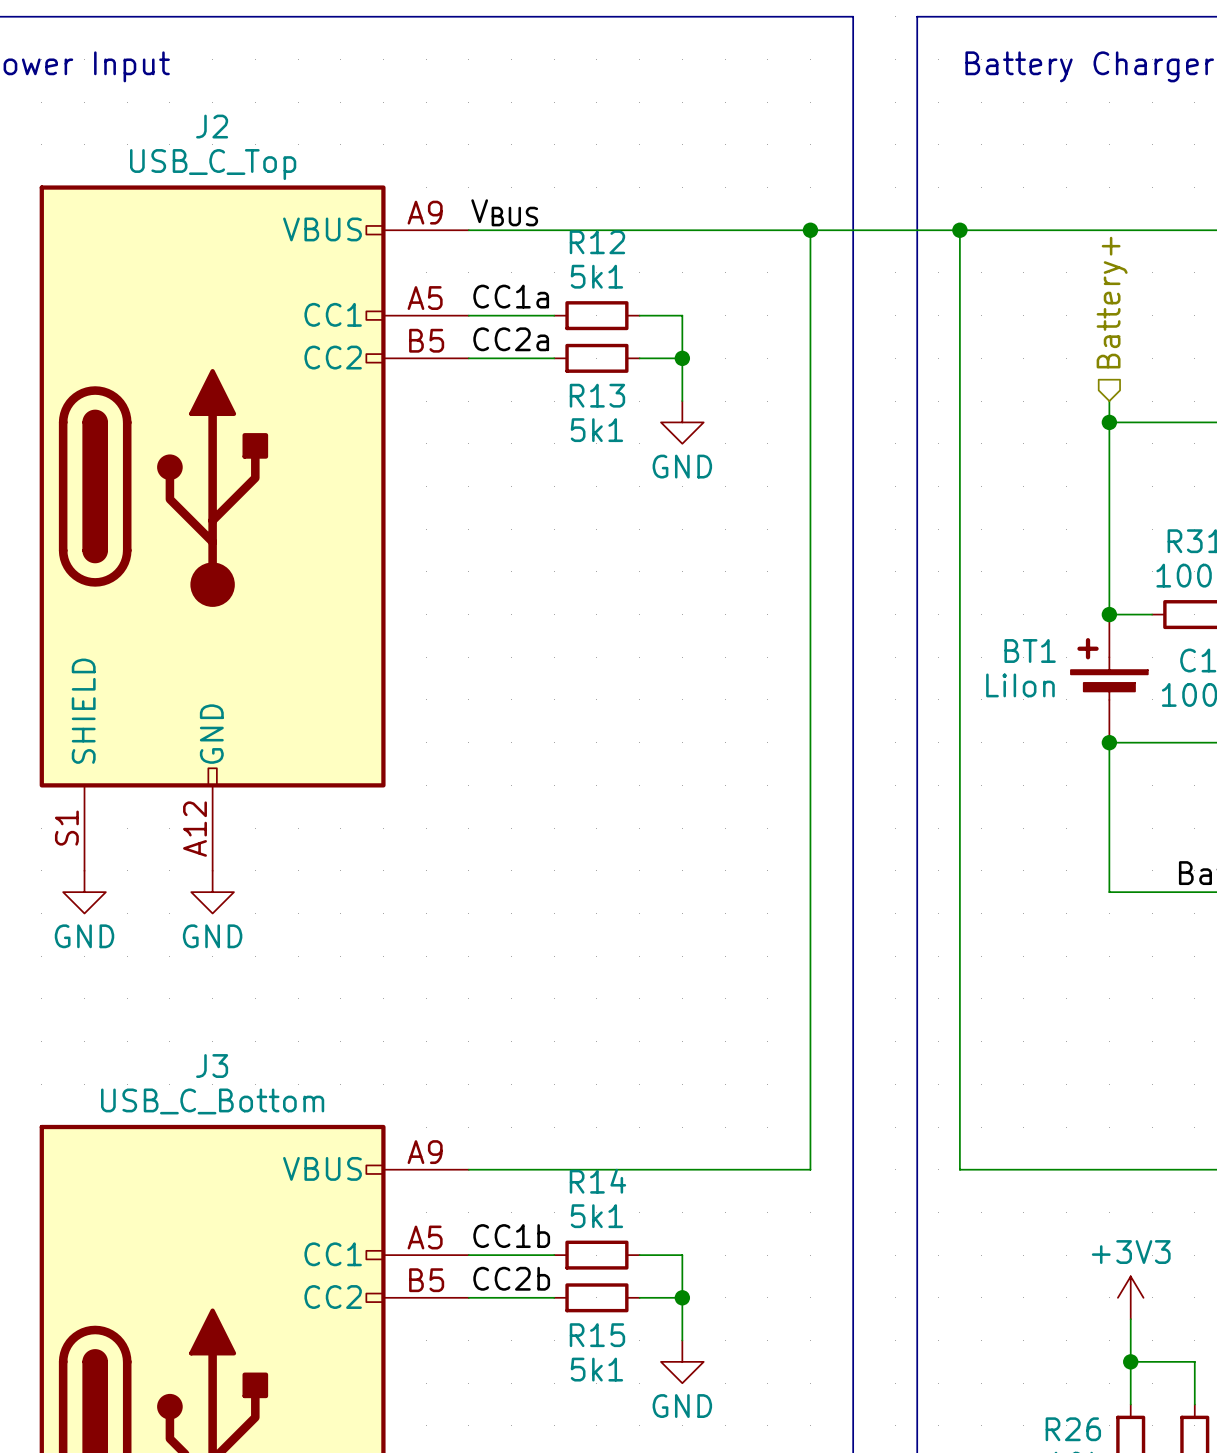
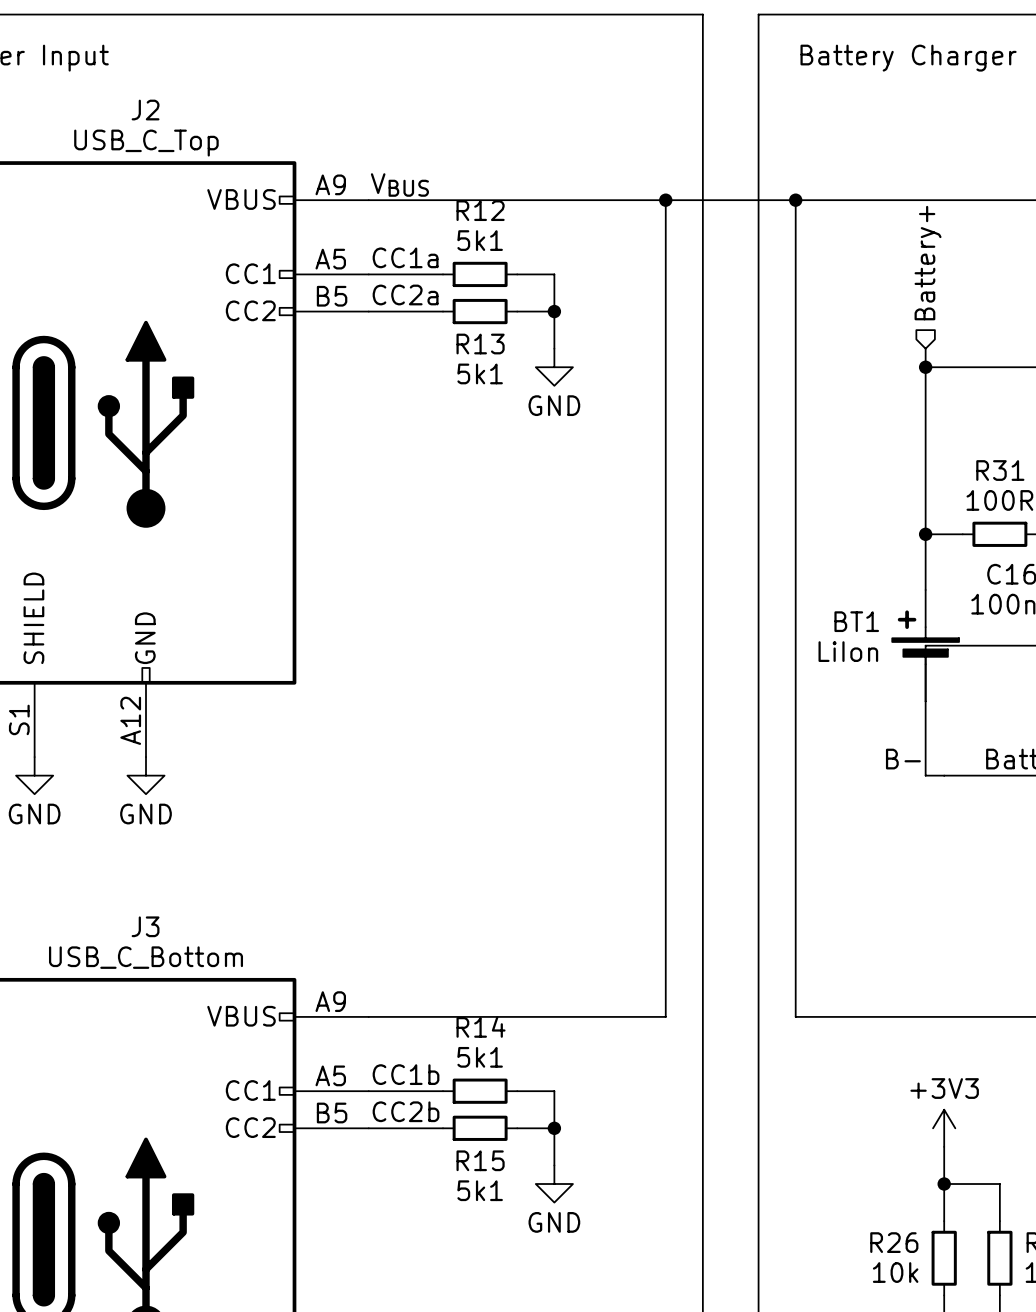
BT1 position: (1109, 678) -> (925, 645)
junction: (1109, 742) -> none
label: none -> B- (903, 759)

